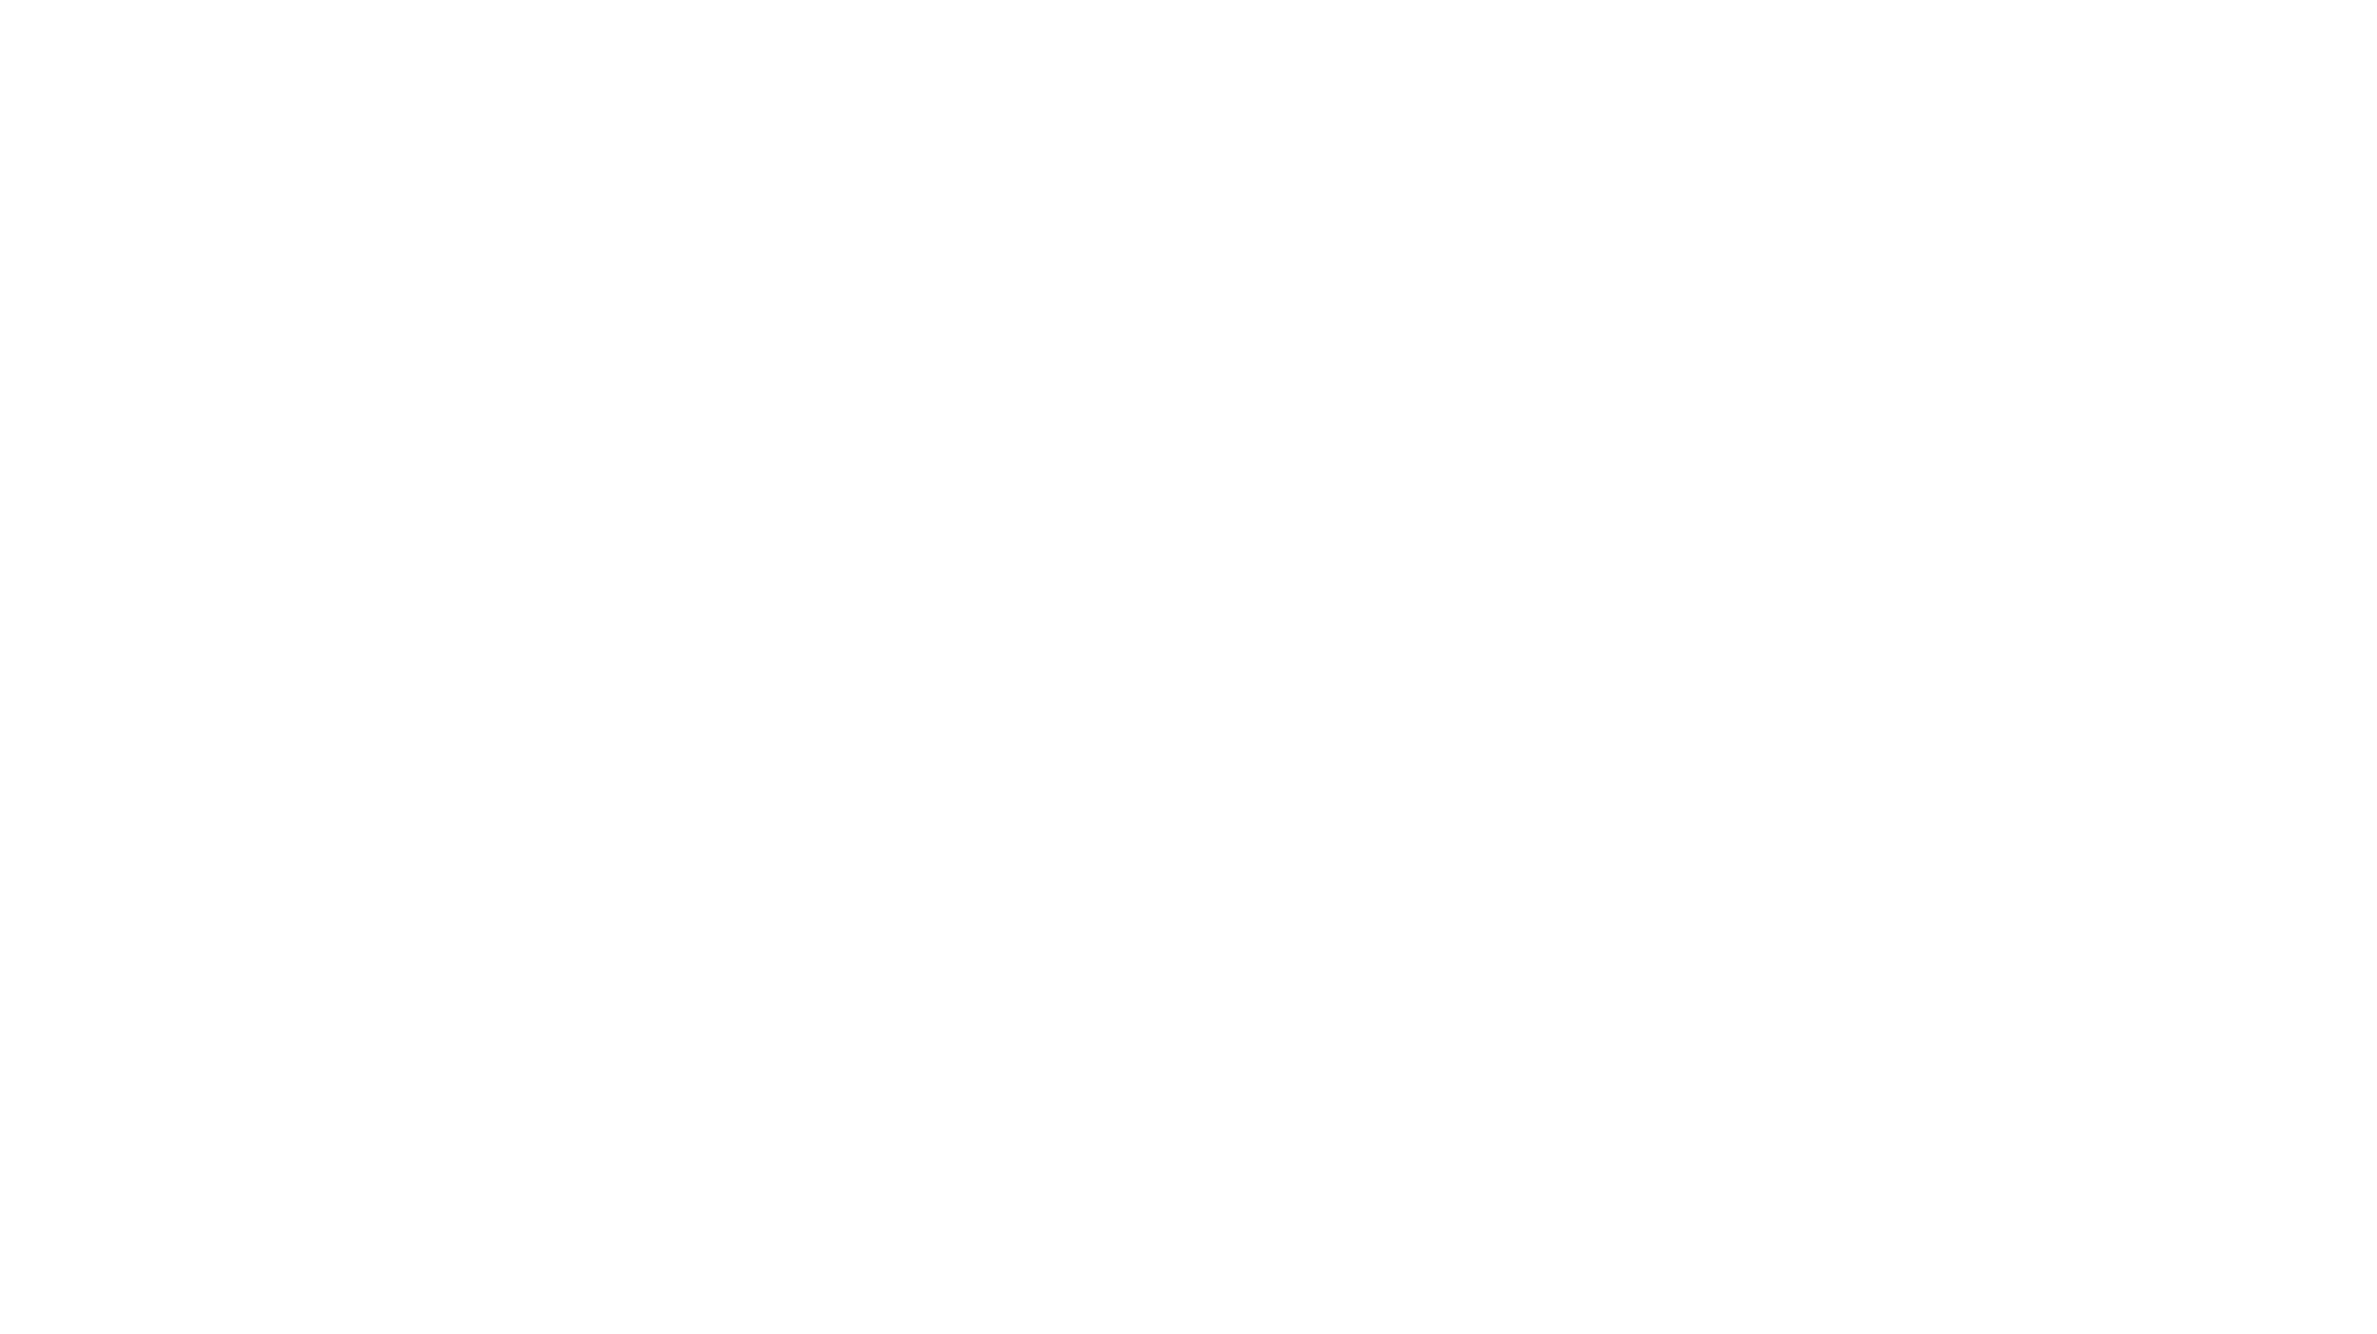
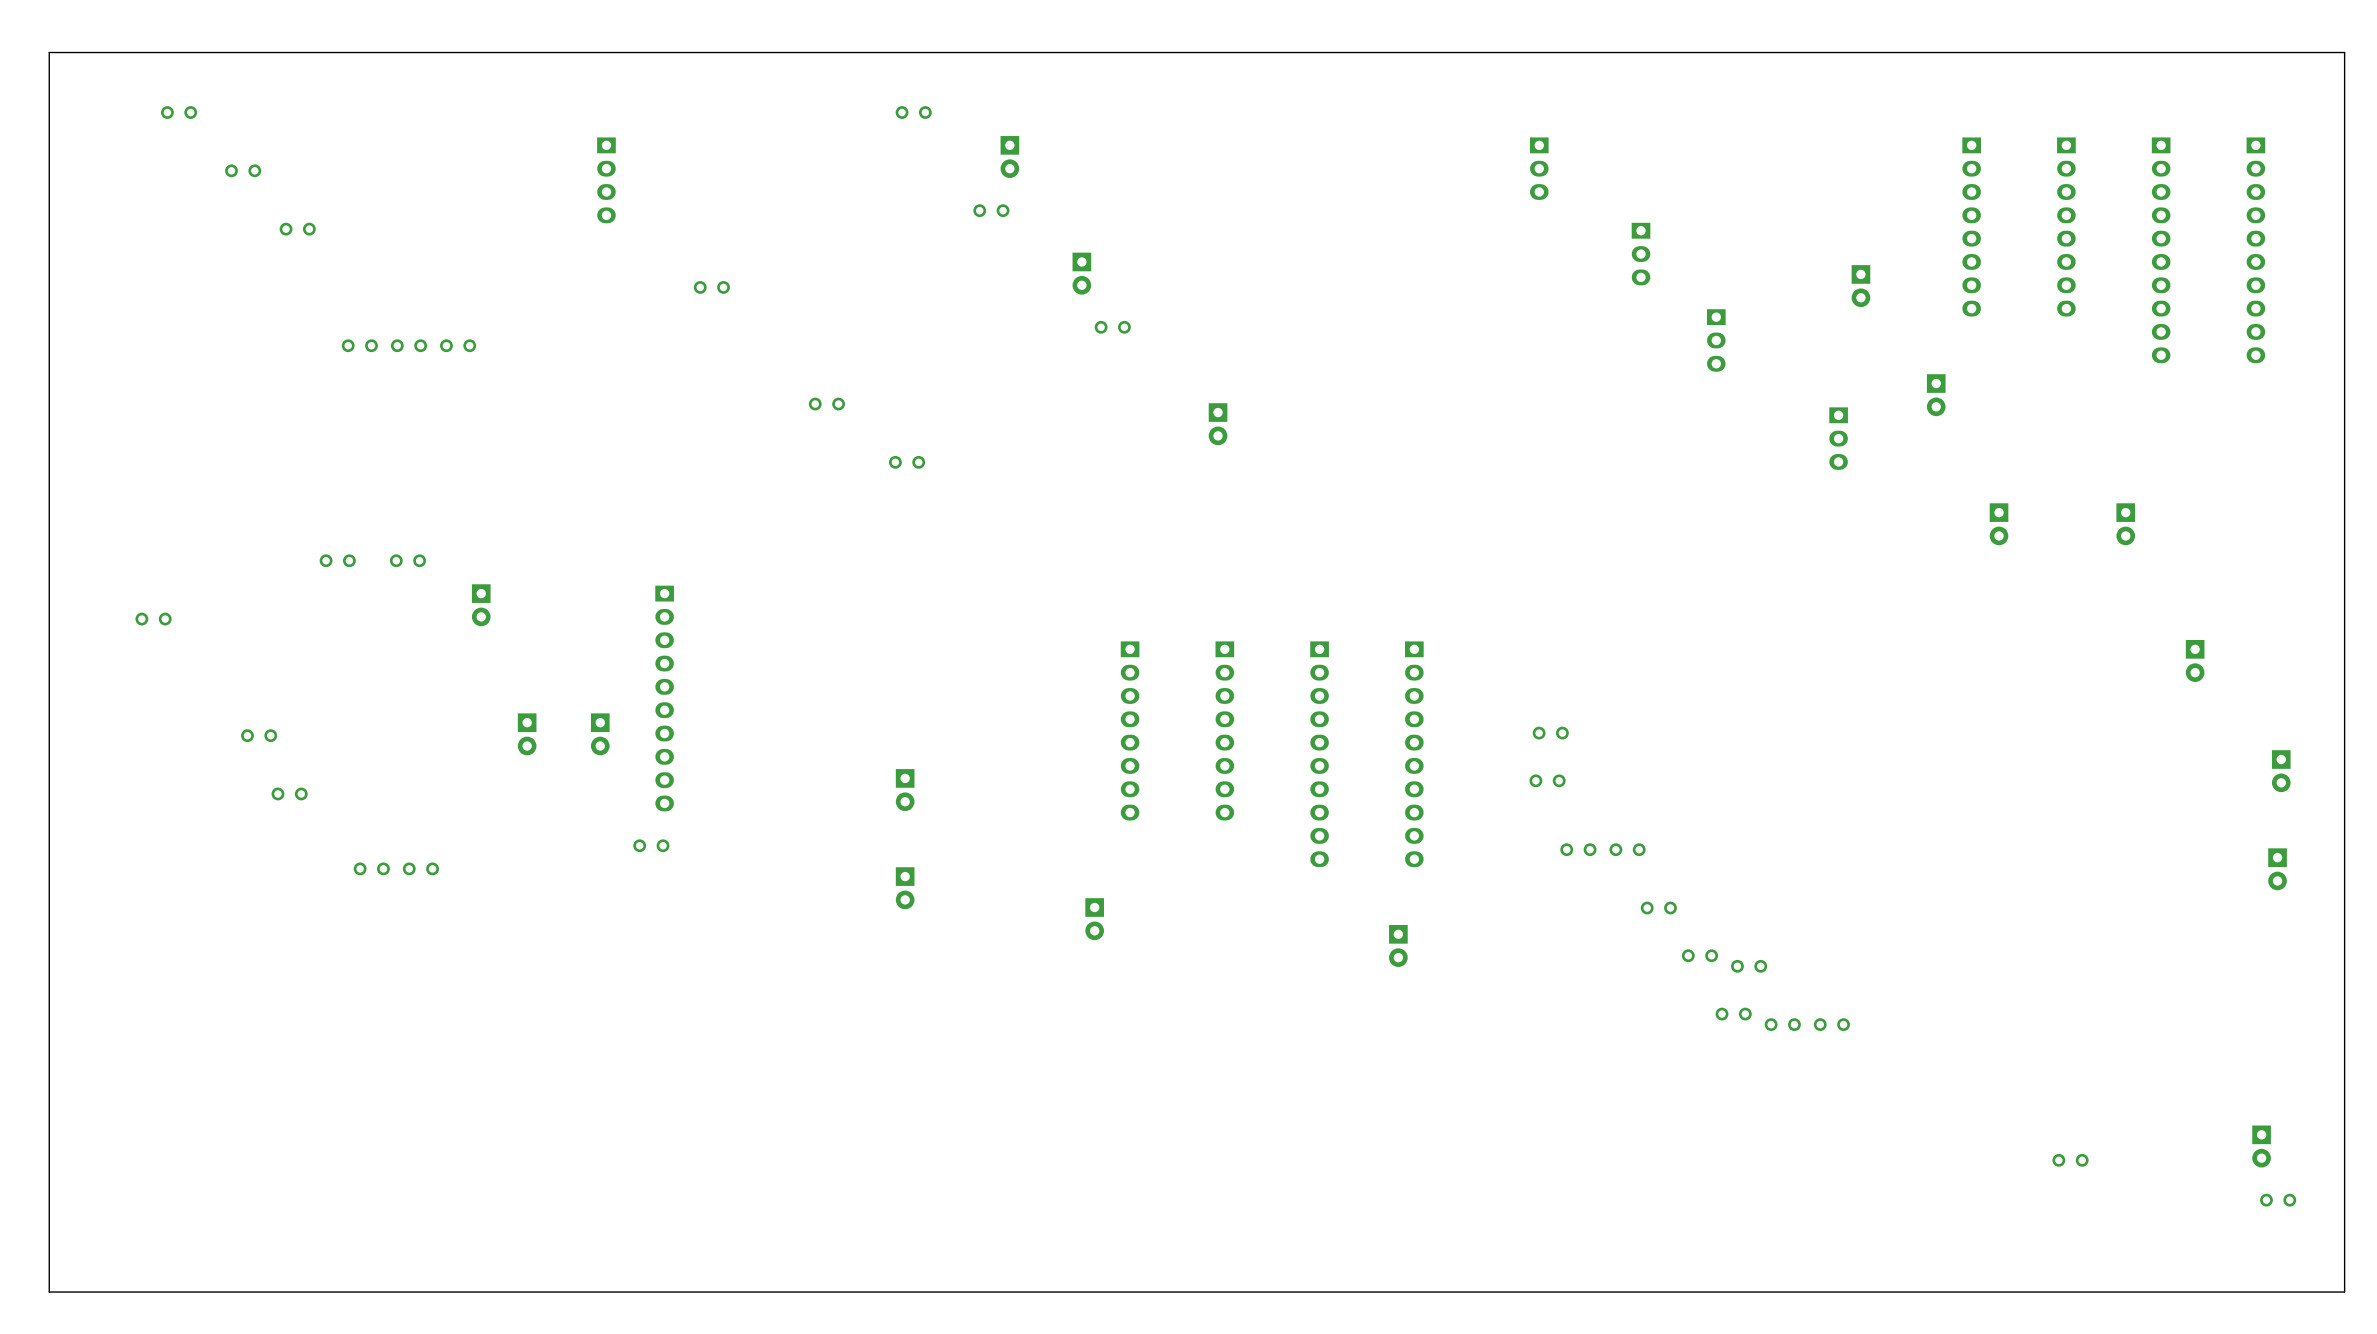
board edge: none -> (2344, 52) (2344, 1292) (49, 1292) (49, 52) (2344, 52)
part: none -> (179, 112)
part: none -> (913, 112)
part: none -> (1009, 157)
part: none -> (1539, 168)
part: none -> (243, 170)
part: none -> (606, 180)
part: none -> (991, 210)
part: none -> (1971, 226)
part: none -> (2066, 226)
part: none -> (297, 229)
part: none -> (2161, 250)
part: none -> (2255, 250)
part: none -> (1641, 254)
part: none -> (1081, 273)
part: none -> (1860, 286)
part: none -> (711, 287)
part: none -> (1112, 327)
part: none -> (1716, 340)
part: none -> (359, 345)
part: none -> (408, 345)
part: none -> (458, 345)
part: none -> (1936, 395)
part: none -> (826, 404)
part: none -> (1218, 424)
part: none -> (1838, 438)
part: none -> (907, 462)
part: none -> (1999, 524)
part: none -> (2125, 524)
part: none -> (337, 560)
part: none -> (407, 560)
part: none -> (481, 605)
part: none -> (153, 619)
part: none -> (2195, 660)
part: none -> (664, 698)
part: none -> (1130, 730)
part: none -> (1224, 730)
part: none -> (1550, 733)
part: none -> (527, 734)
part: none -> (600, 734)
part: none -> (259, 735)
part: none -> (1319, 754)
part: none -> (1414, 754)
part: none -> (2281, 771)
part: none -> (1547, 780)
part: none -> (905, 790)
part: none -> (289, 793)
part: none -> (651, 845)
part: none -> (1578, 849)
part: none -> (1627, 849)
part: none -> (371, 868)
part: none -> (420, 868)
part: none -> (2277, 869)
part: none -> (905, 888)
part: none -> (1658, 908)
part: none -> (1094, 919)
part: none -> (1398, 945)
part: none -> (1699, 955)
part: none -> (1749, 966)
part: none -> (1733, 1014)
part: none -> (1782, 1024)
part: none -> (1831, 1024)
part: none -> (2261, 1146)
part: none -> (2070, 1160)
part: none -> (2278, 1200)

